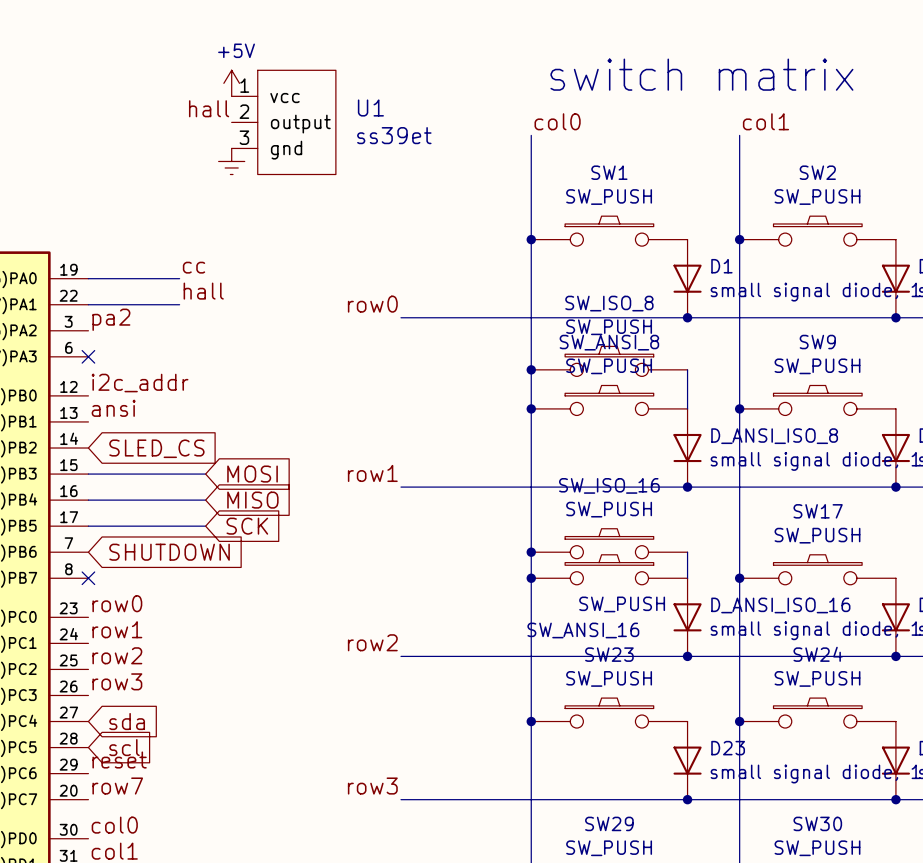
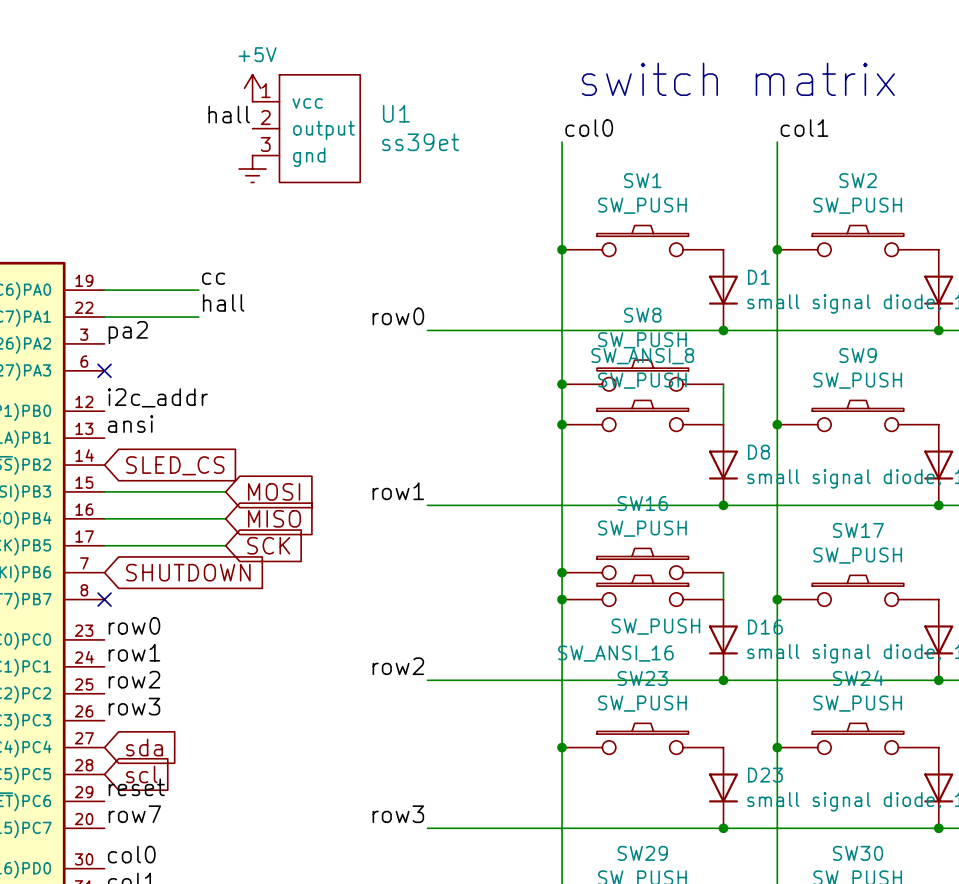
SW_ISO_8 name: SW_ISO_8 (609, 303) -> SW8 (642, 315)
D_ANSI_ISO_8 name: D_ANSI_ISO_8 (774, 436) -> D8 (759, 452)
SW_ISO_16 name: SW_ISO_16 (609, 485) -> SW16 (642, 503)
D_ANSI_ISO_16 name: D_ANSI_ISO_16 (780, 605) -> D16 (765, 627)

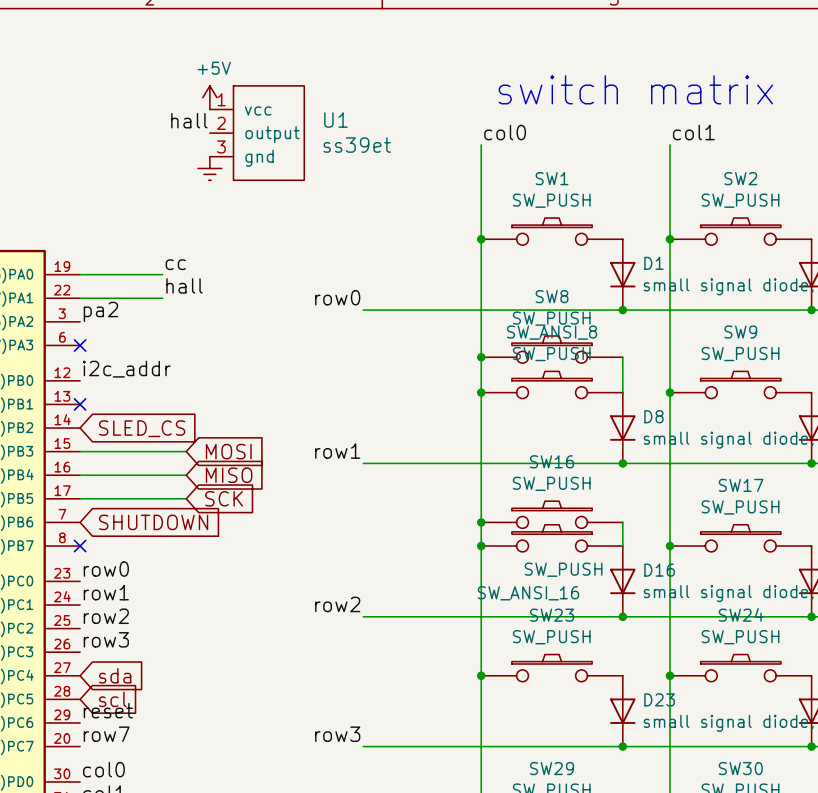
label: ansi (130, 424) -> none
no-connect mark: none -> (80, 404)

